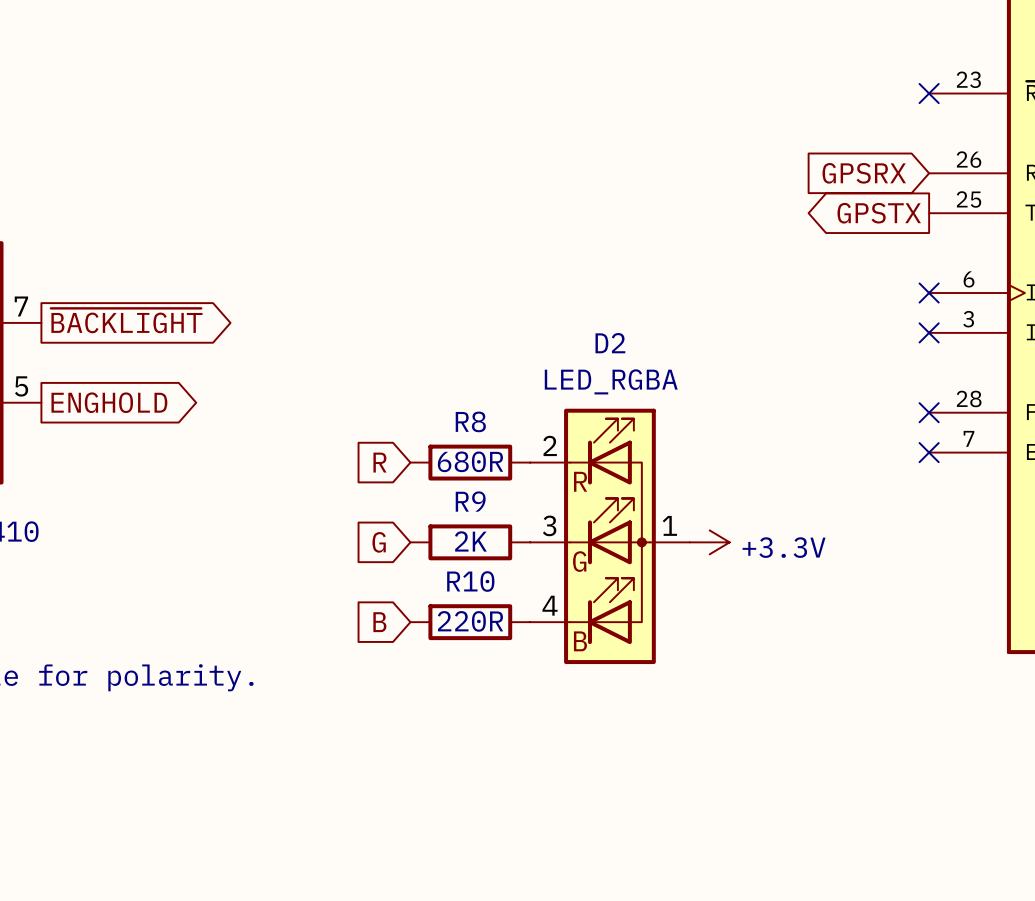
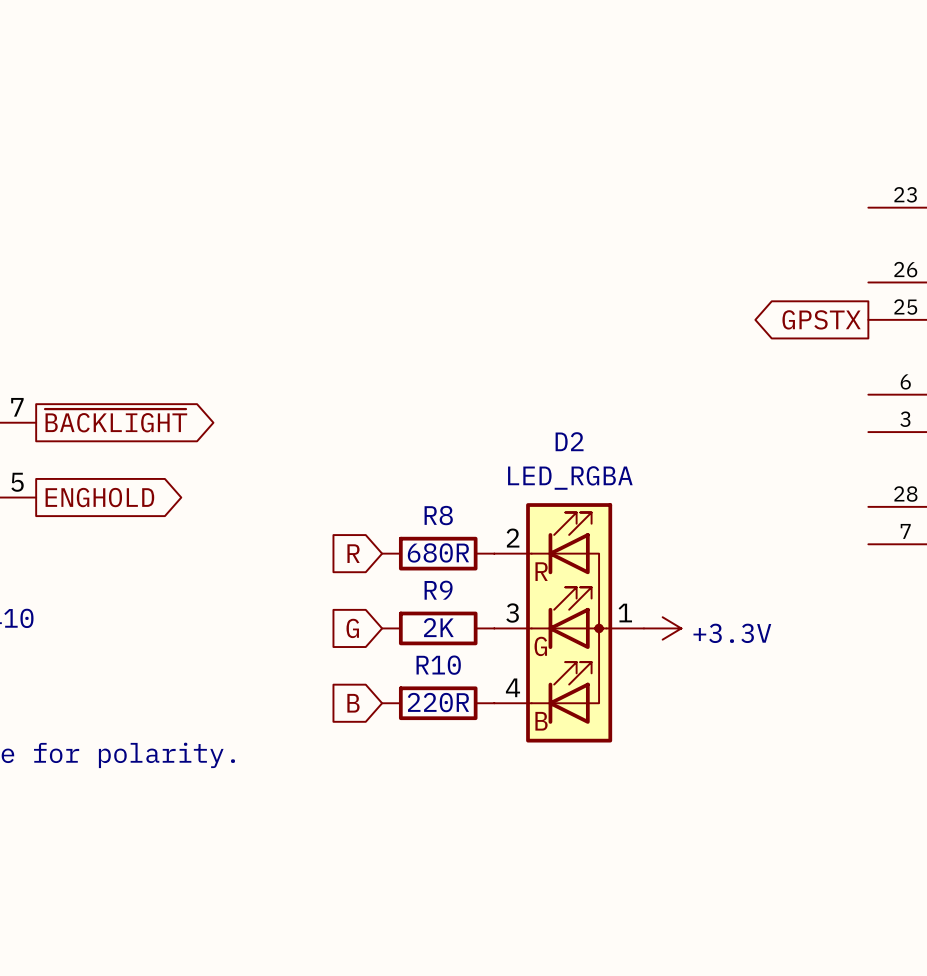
no-connect mark: (929, 93) -> none
global label: GPSRX (864, 173) -> none
no-connect mark: (929, 293) -> none
no-connect mark: (929, 332) -> none
no-connect mark: (929, 412) -> none
no-connect mark: (929, 452) -> none

